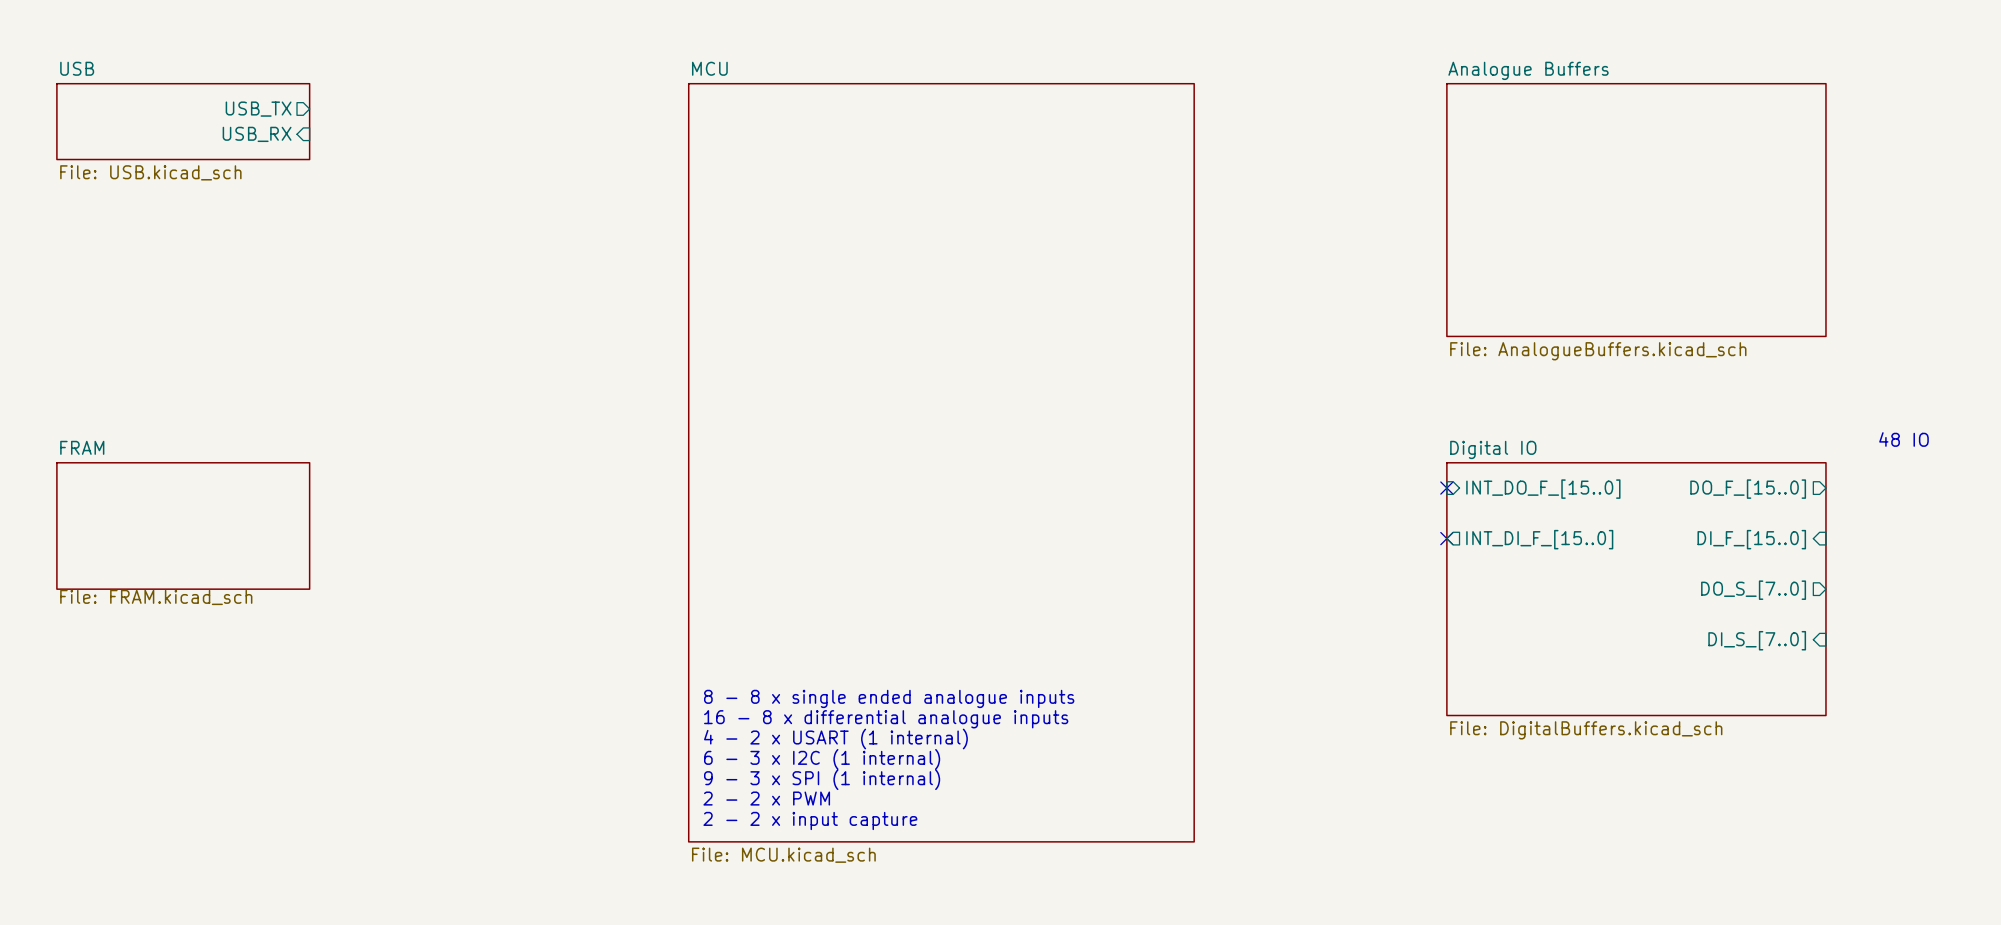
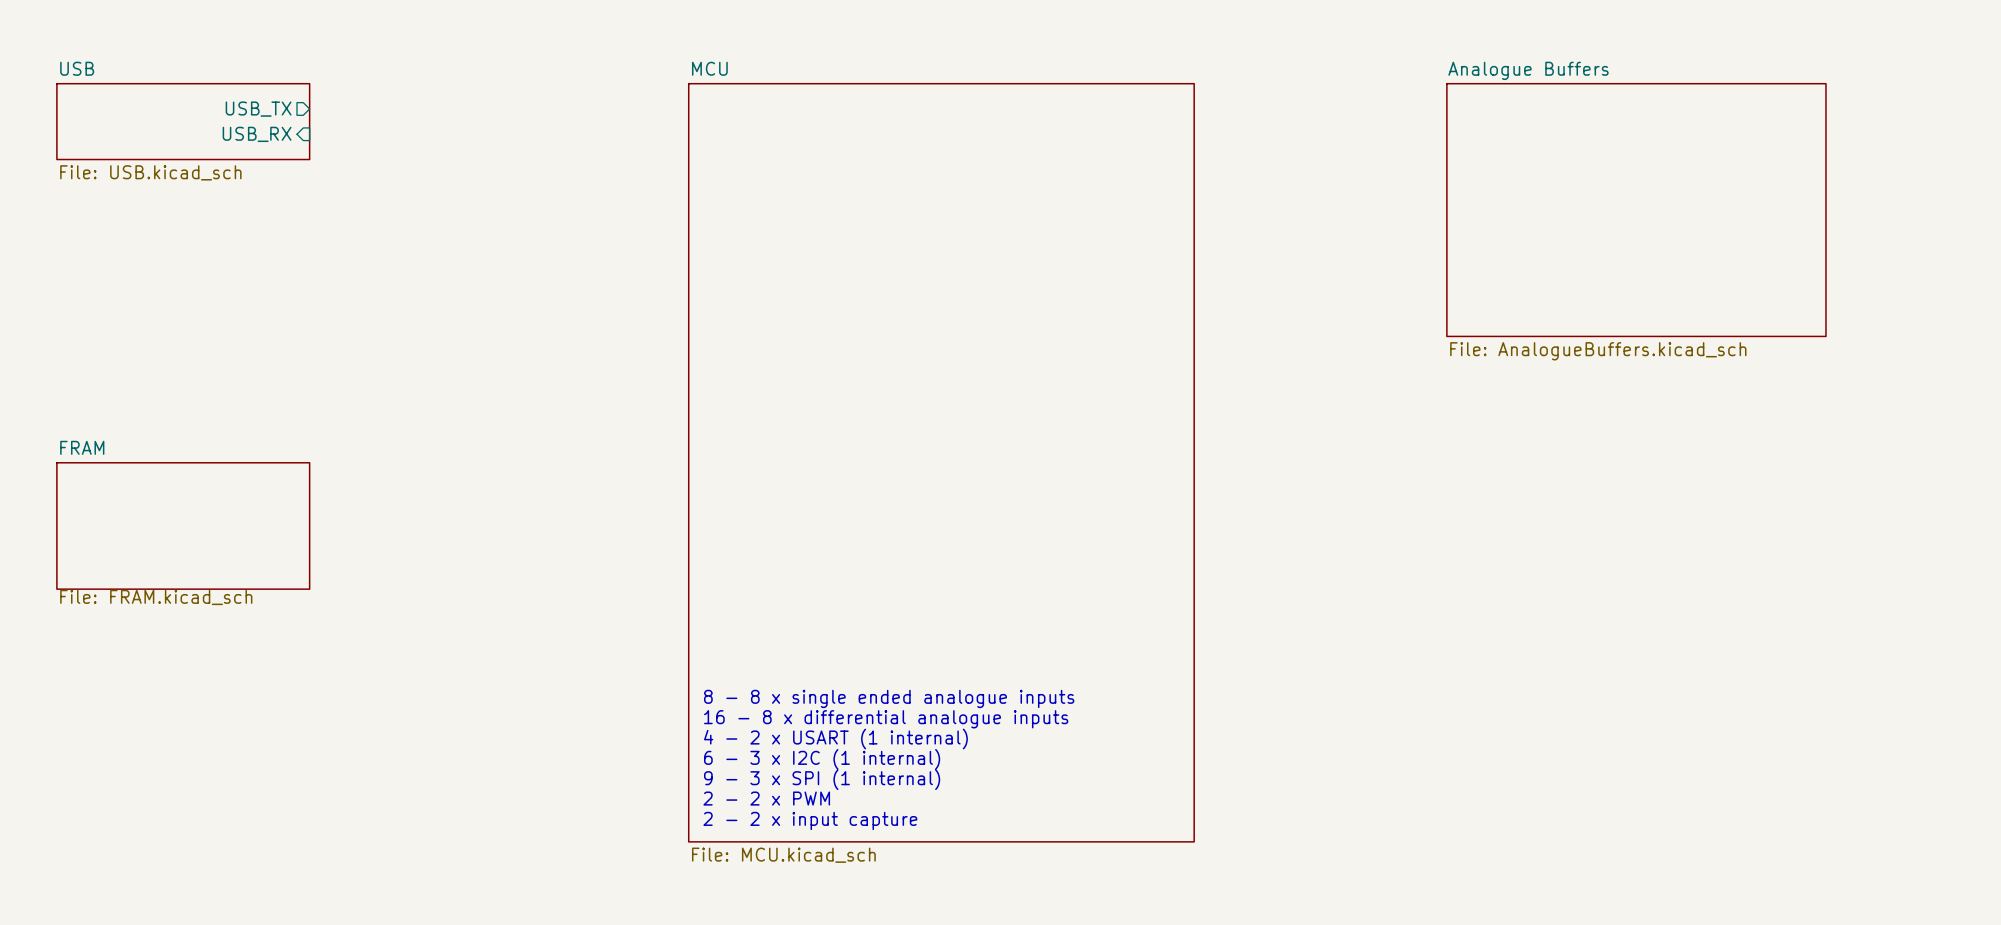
text: 48 IO (1903, 439) -> none
no-connect mark: (1446, 488) -> none
sheet pin: INT_DO_F_[15..0] (1543, 489) -> none
sheet pin: DO_F_[15..0] (1748, 489) -> none
no-connect mark: (1446, 538) -> none
sheet pin: INT_DI_F_[15..0] (1539, 539) -> none
sheet pin: DI_F_[15..0] (1751, 539) -> none
sheet Digital IO: File: DigitalBuffers.kicad_sch (1636, 589) -> none
sheet pin: DO_S_[7..0] (1753, 590) -> none
sheet pin: DI_S_[7..0] (1757, 640) -> none

